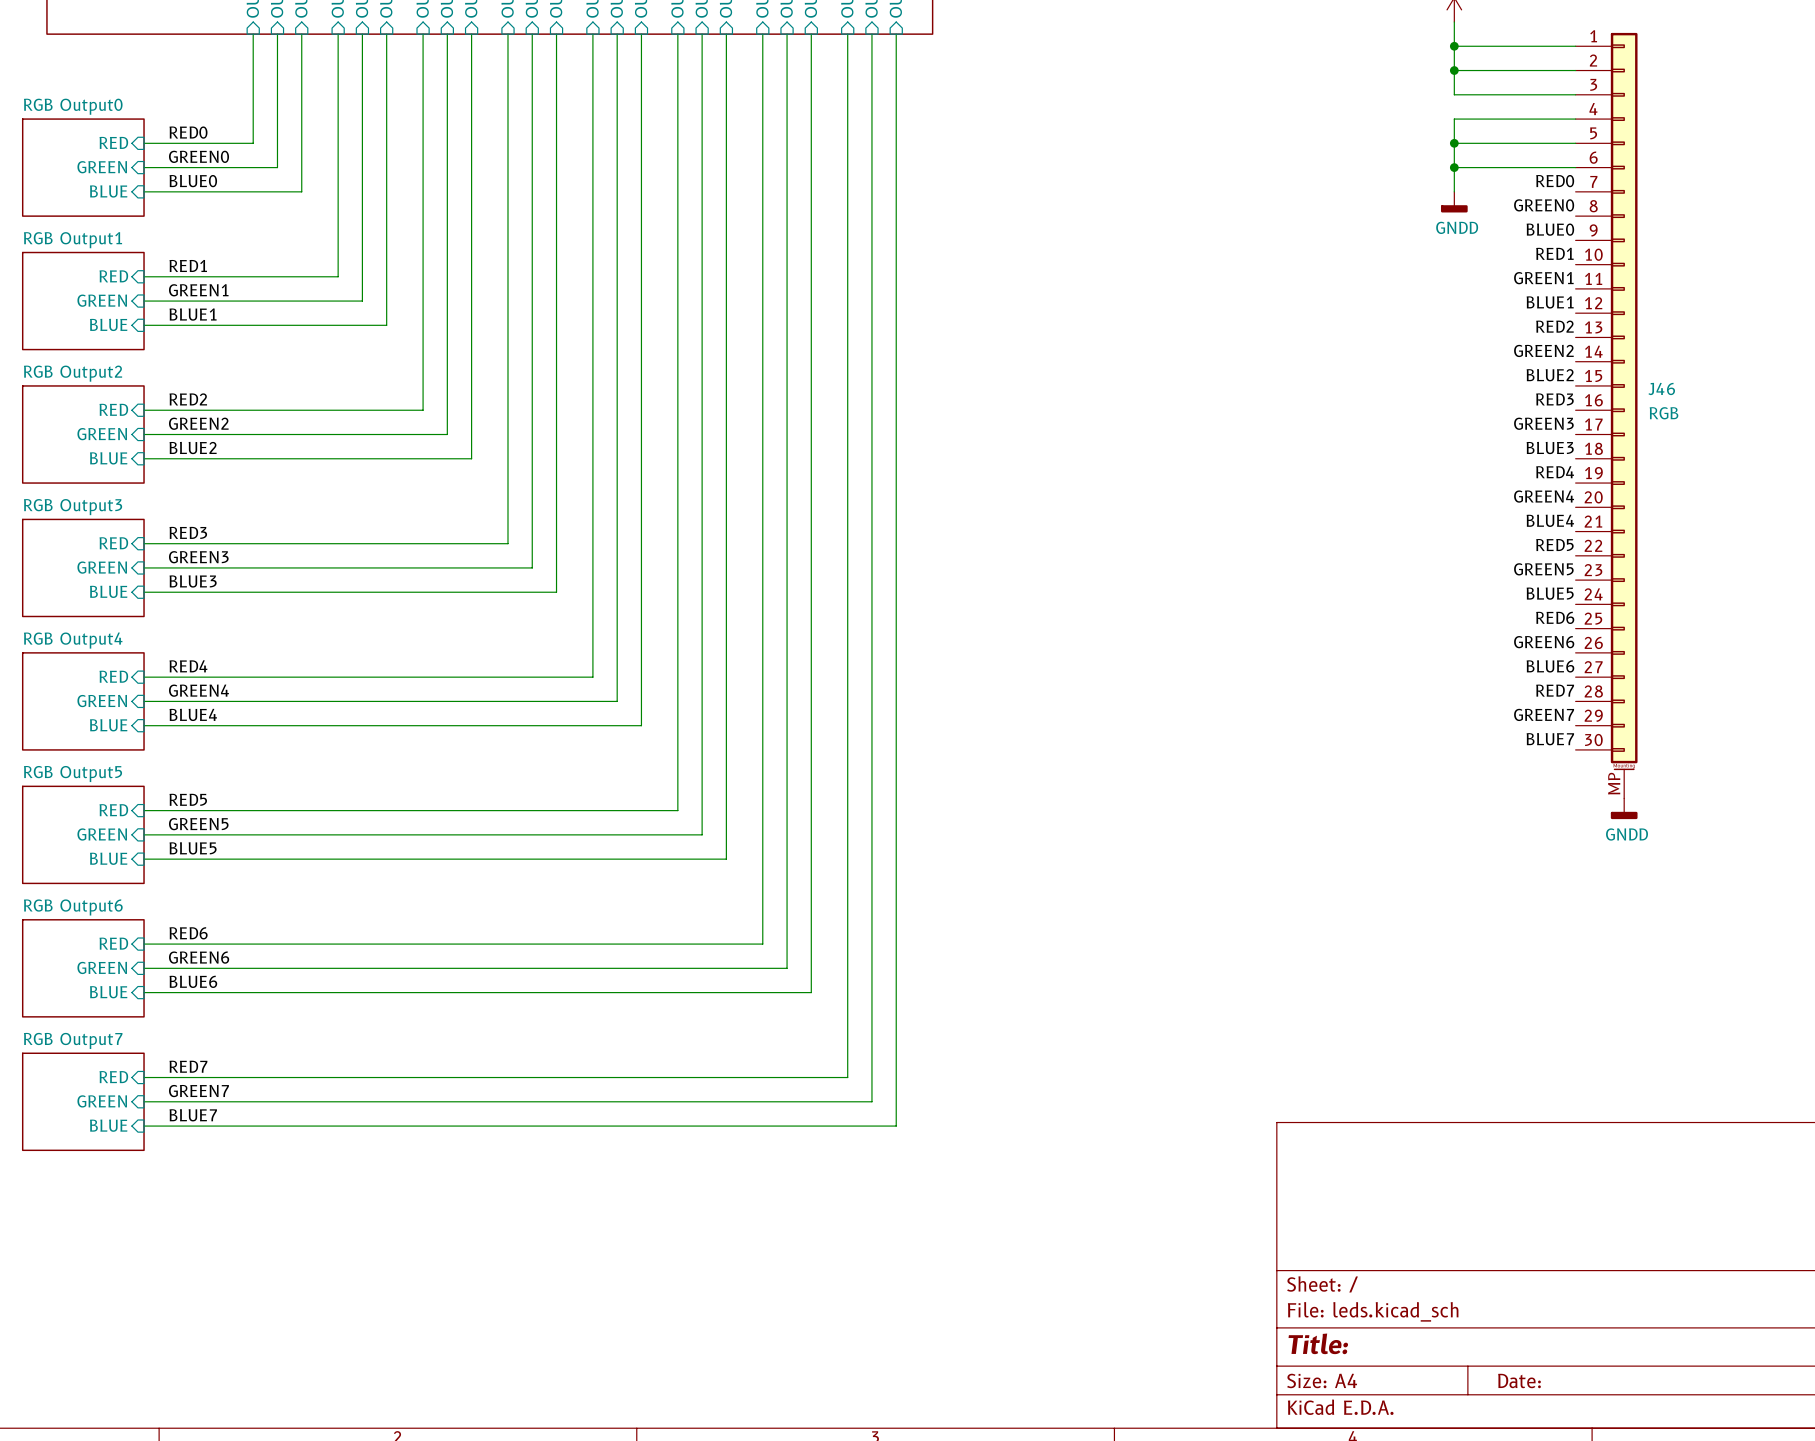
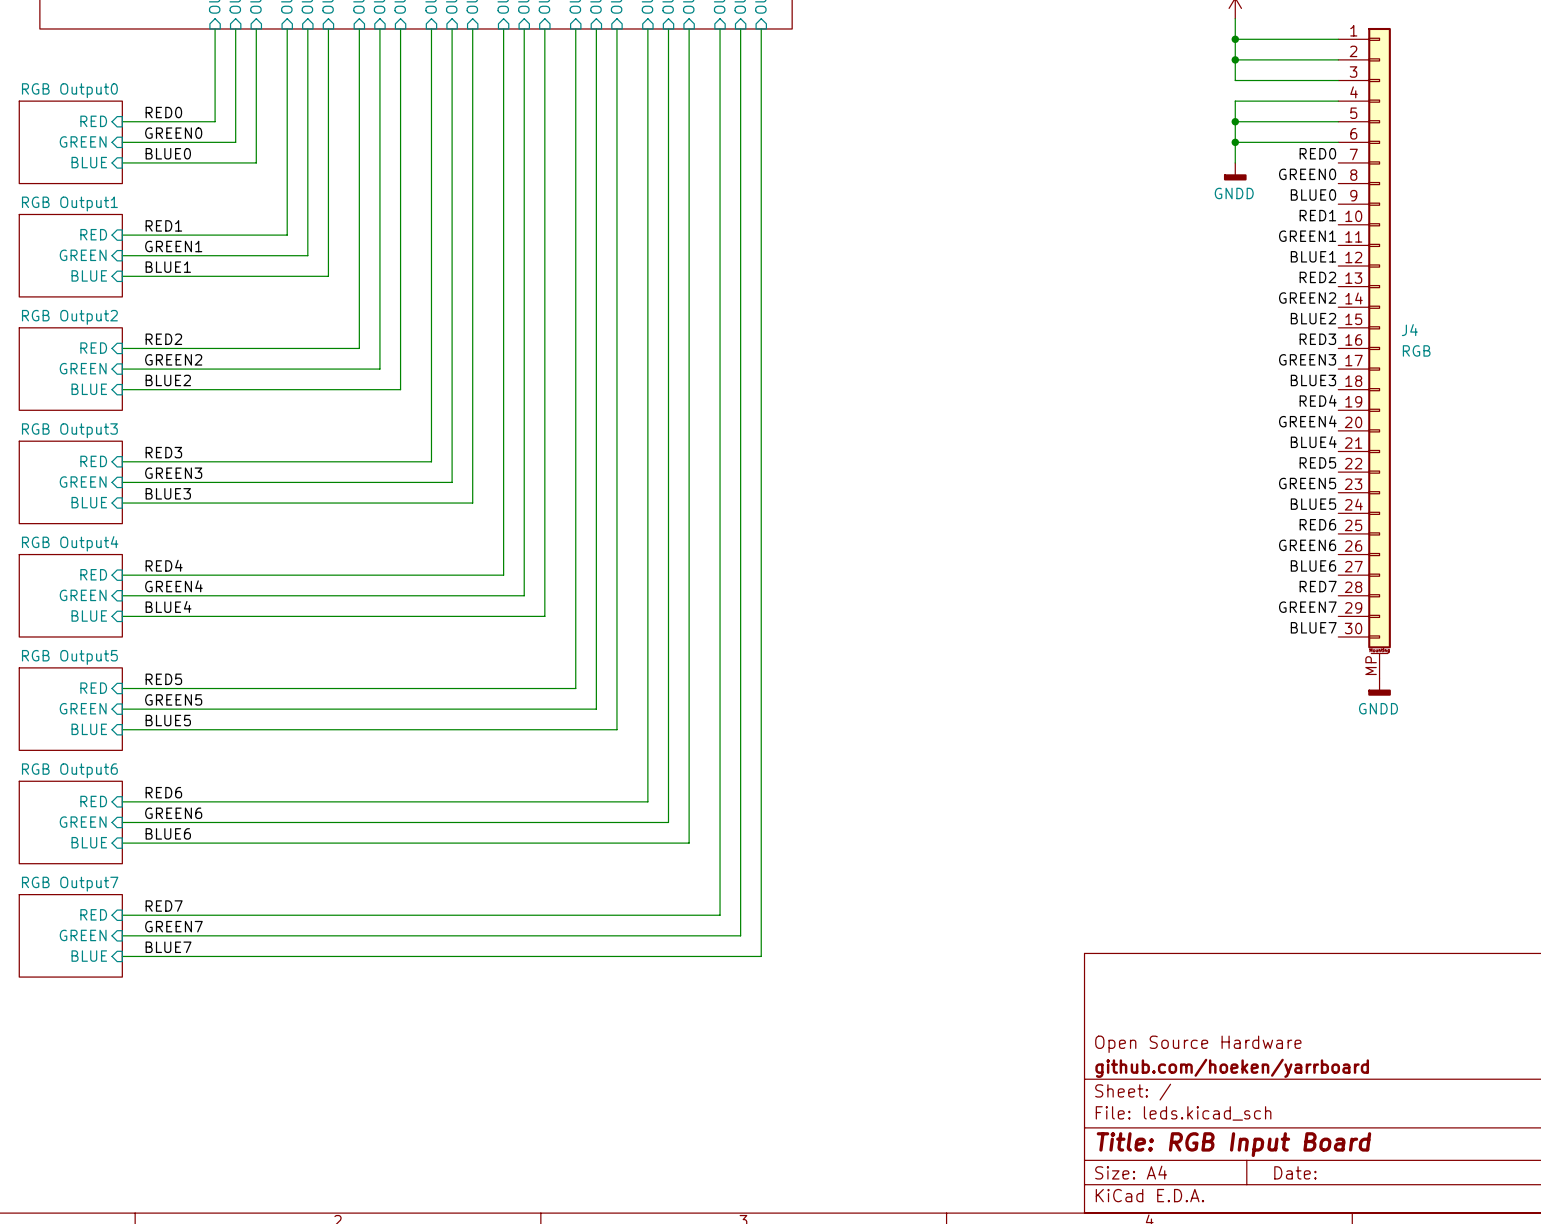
J46 name: J46 (1661, 388) -> J4 (1409, 330)
title block: none -> Open Source Hardware (1198, 1044)
title block: none -> github.com/hoeken/yarrboard (1232, 1068)
title block: Title: (1318, 1343) -> Title: RGB Input Board (1233, 1144)

